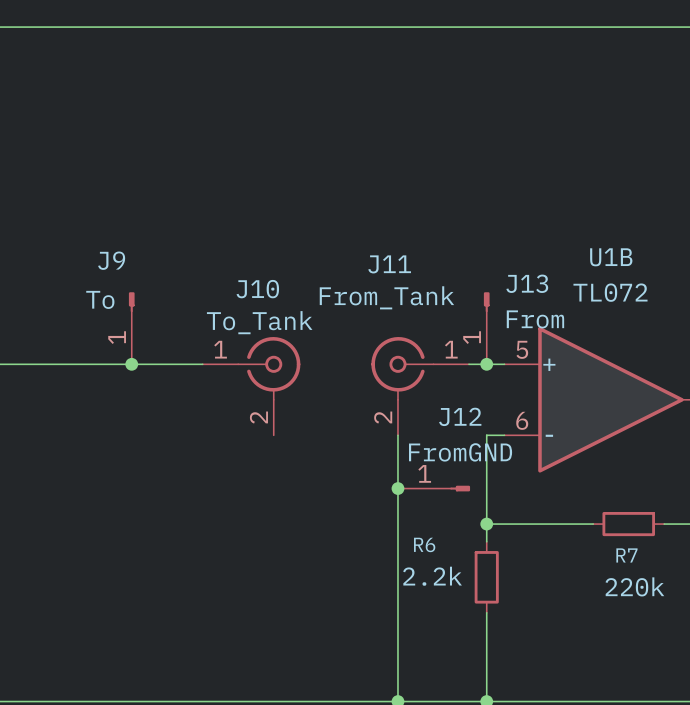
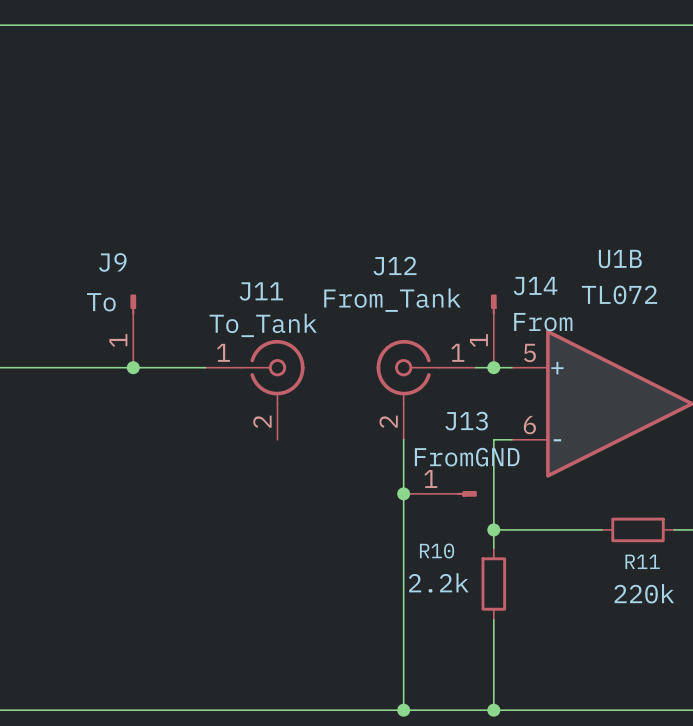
J11 name: J11 (389, 264) -> J12 (394, 266)
J13 name: J13 (527, 283) -> J14 (535, 286)
J10 name: J10 (257, 289) -> J11 (261, 291)
J12 name: J12 (460, 416) -> J13 (466, 421)
R6 name: R6 (424, 544) -> R10 (437, 551)
R7 name: R7 (626, 555) -> R11 (642, 561)

